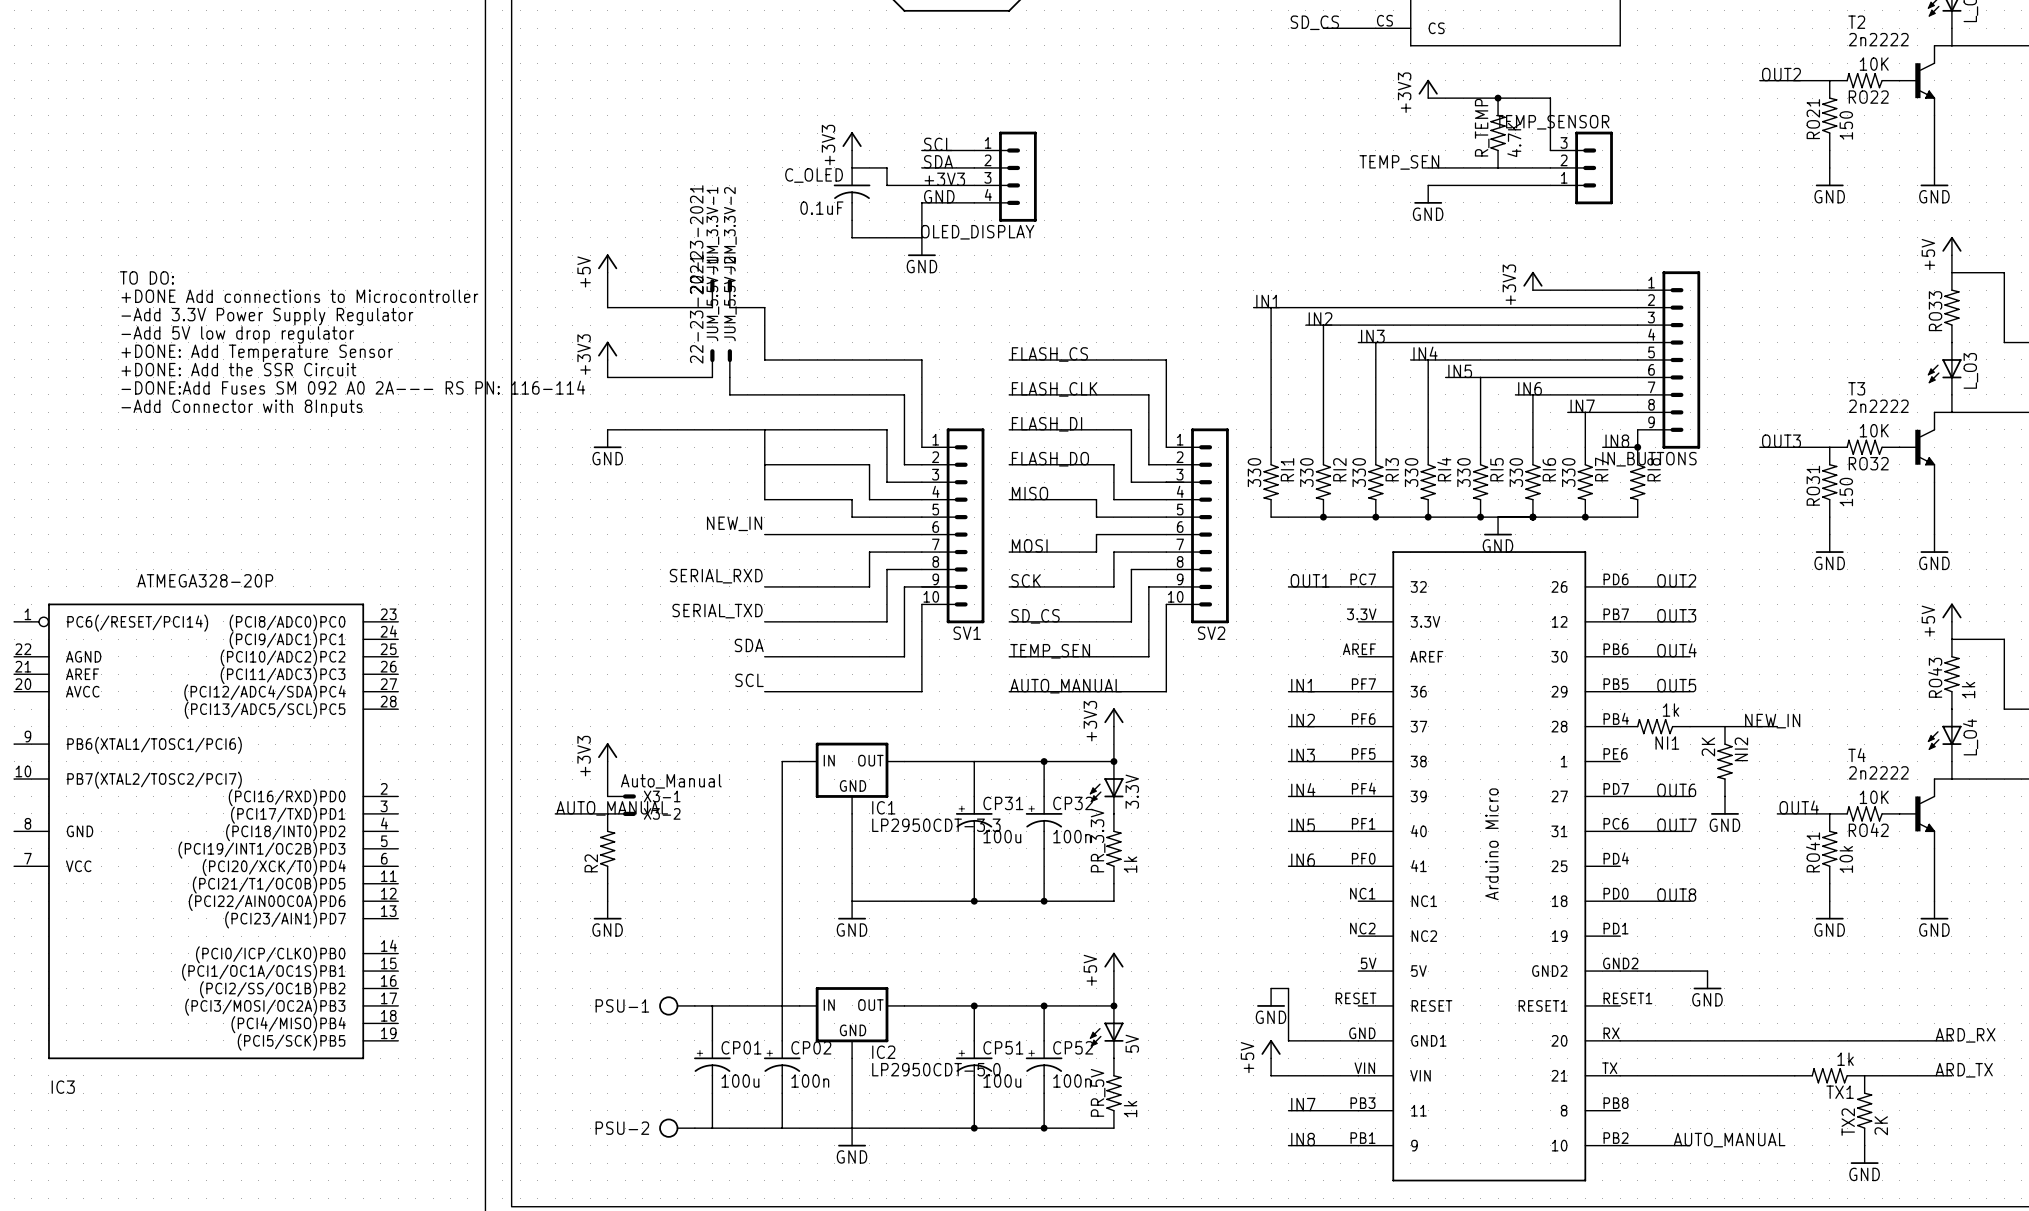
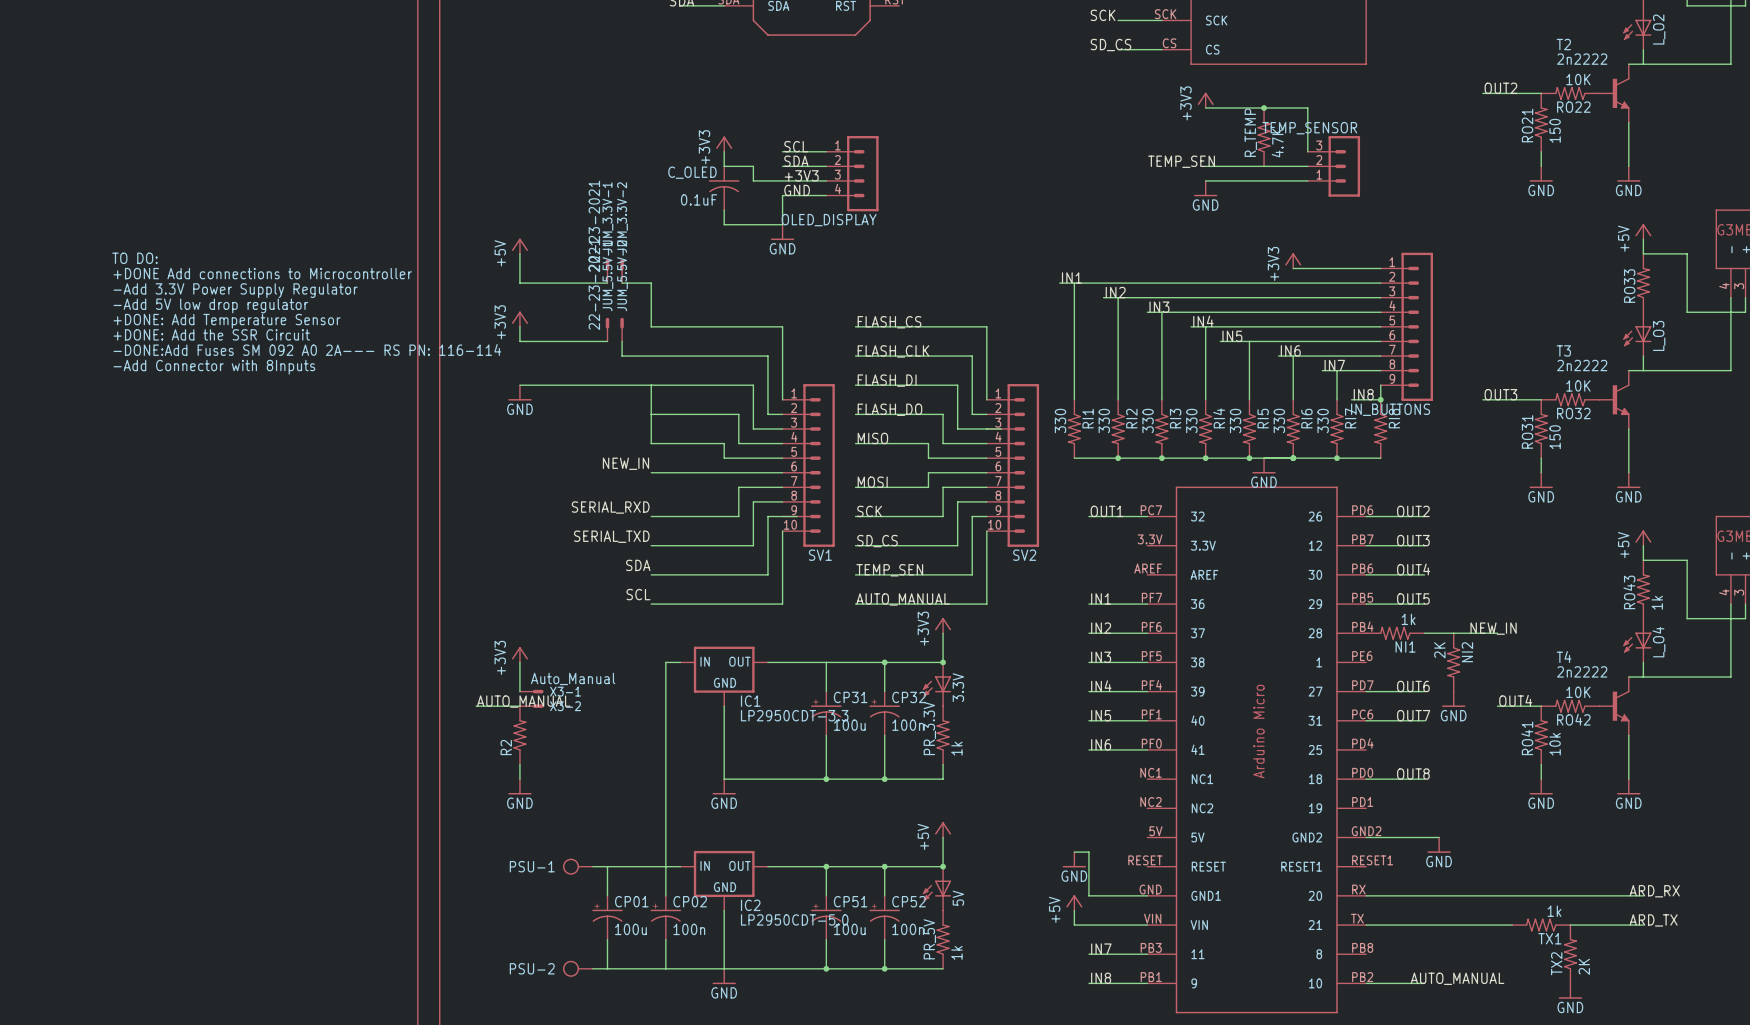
IC3: ATMEGA328-20P (206, 831) -> none

